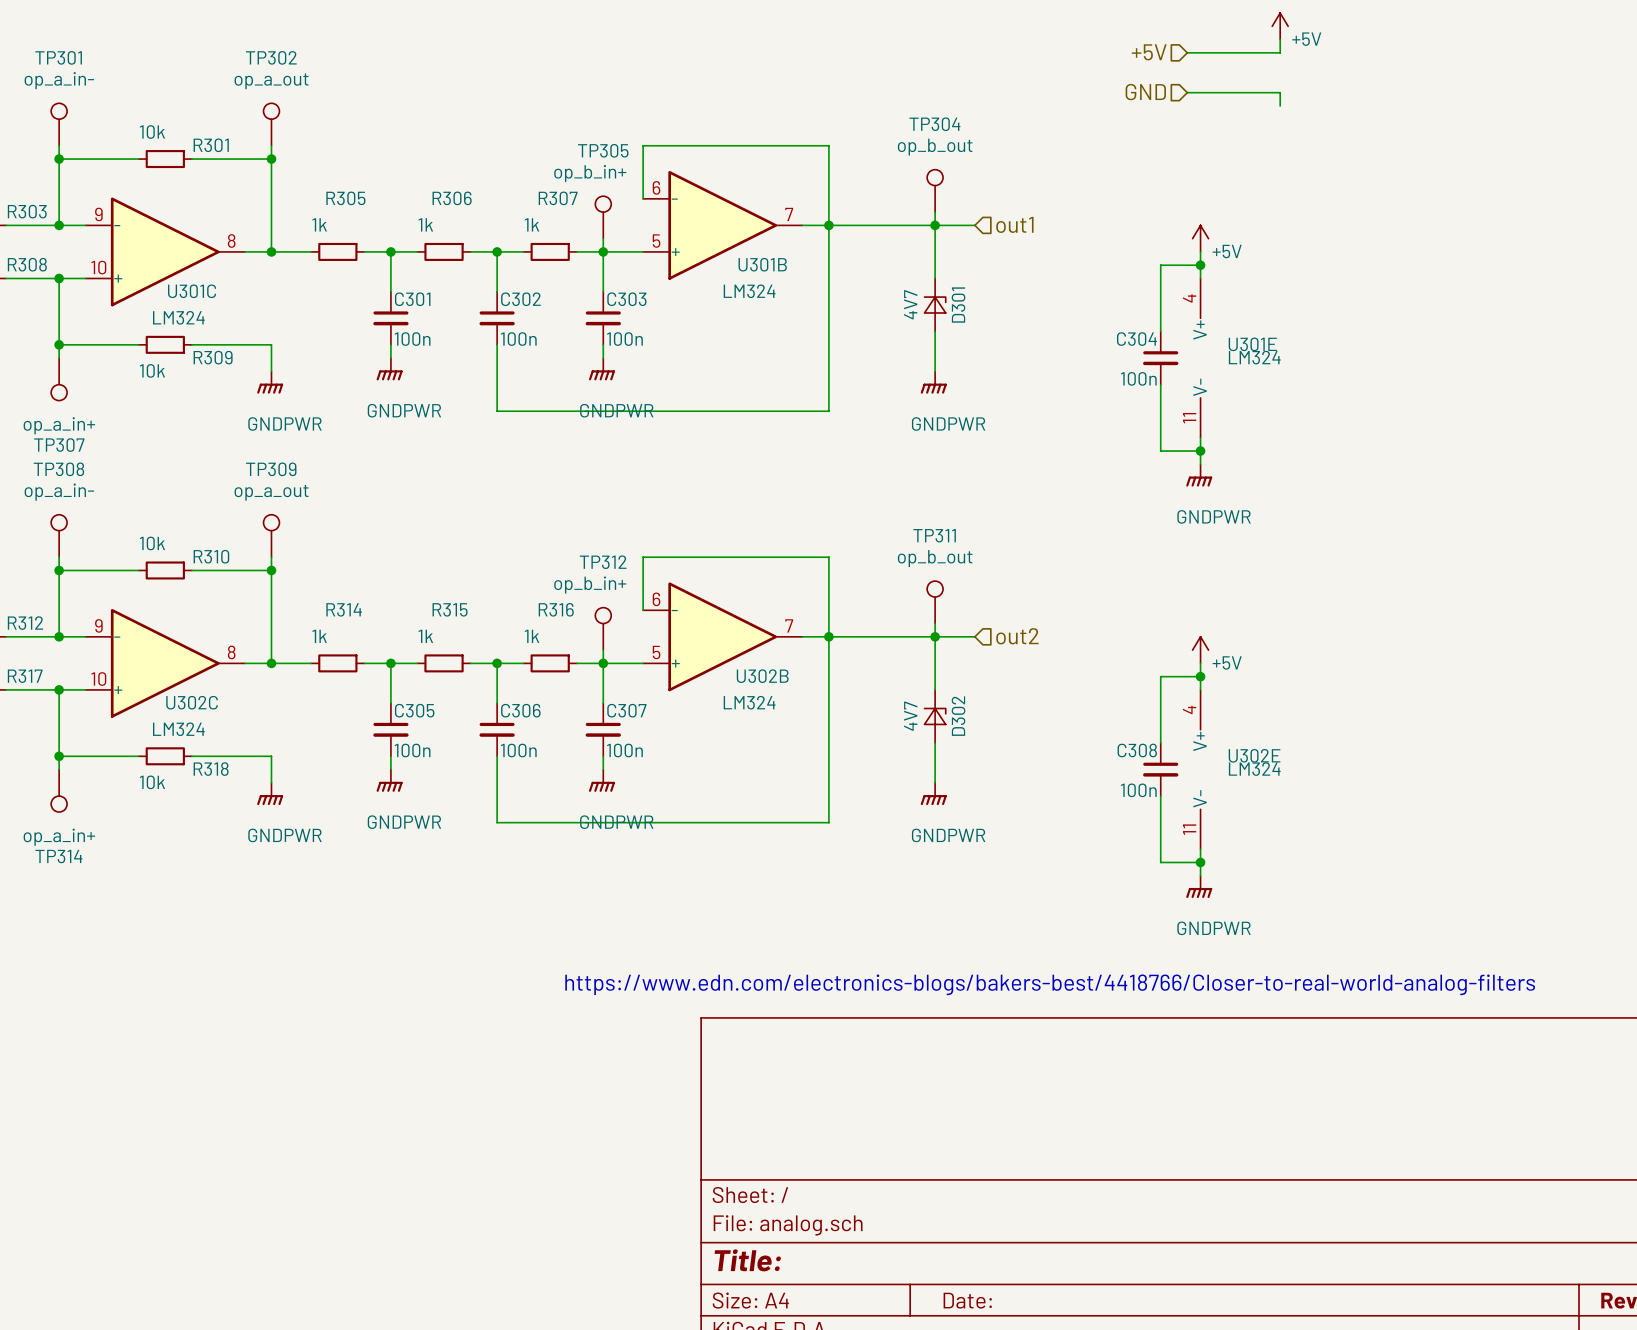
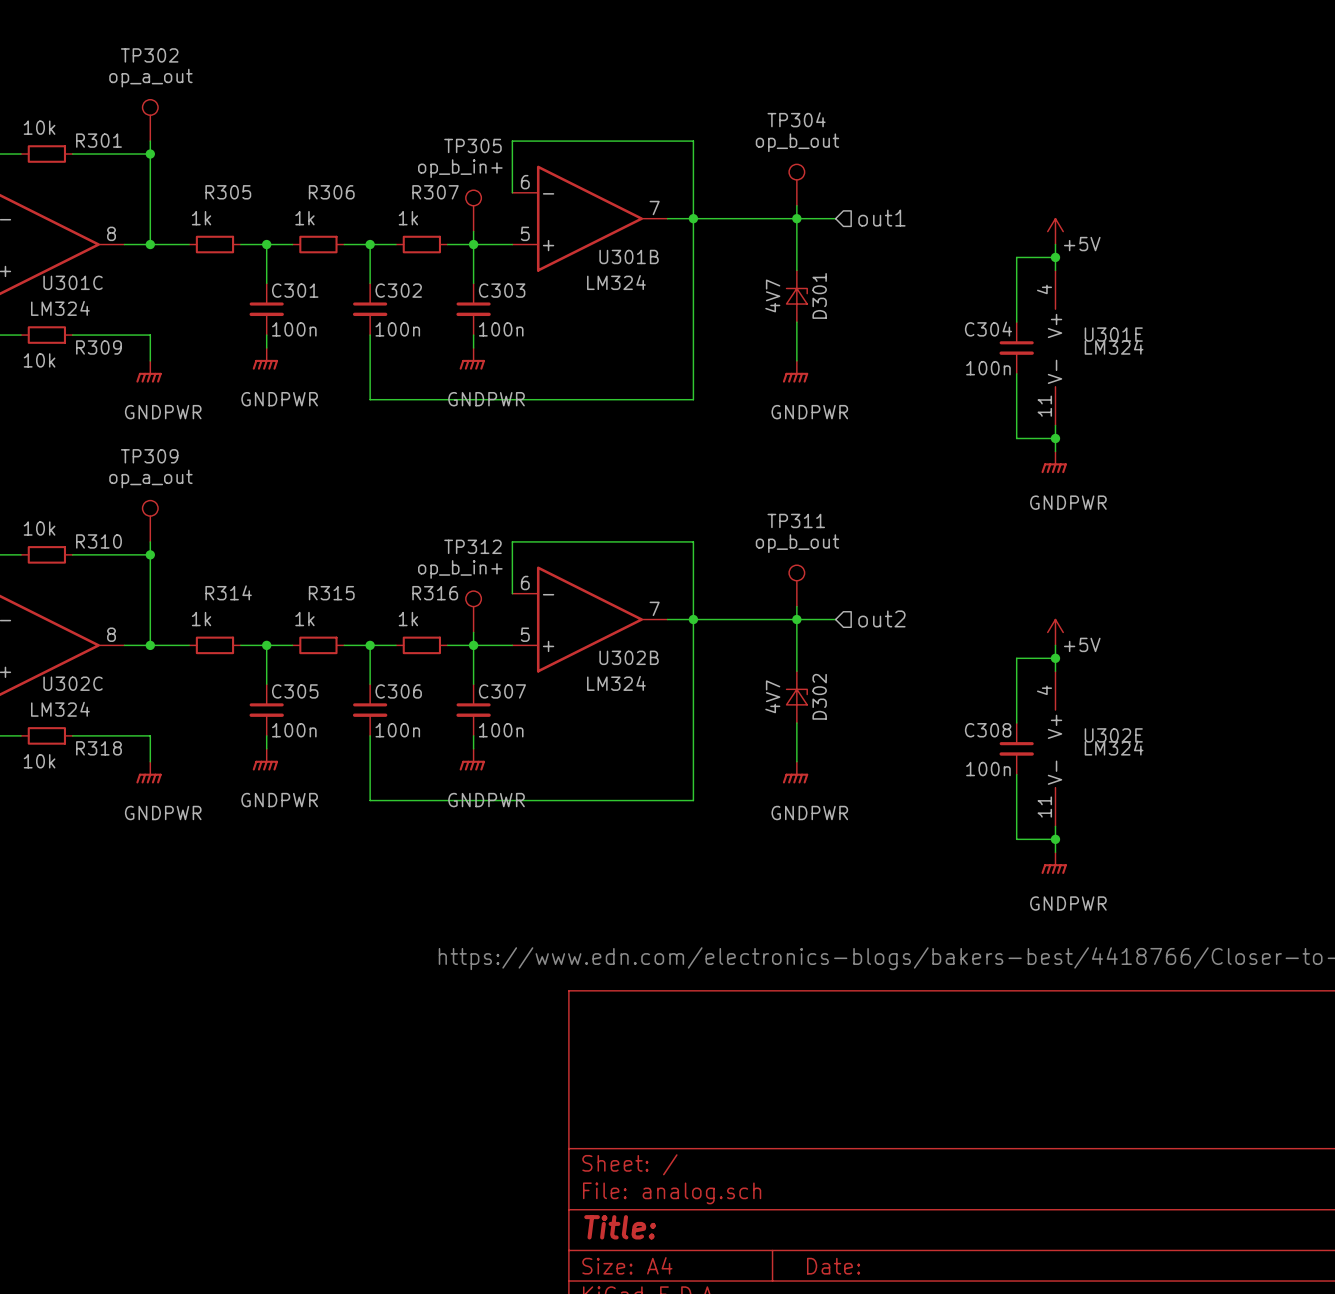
power symbol: +5V (1280, 26) -> none
wire: (1280, 39) (1280, 52) (1187, 52) -> none
hierarchical label: +5V (1149, 52) -> none
hierarchical label: GND (1145, 92) -> none
wire: (1187, 92) (1280, 92) (1280, 105) -> none

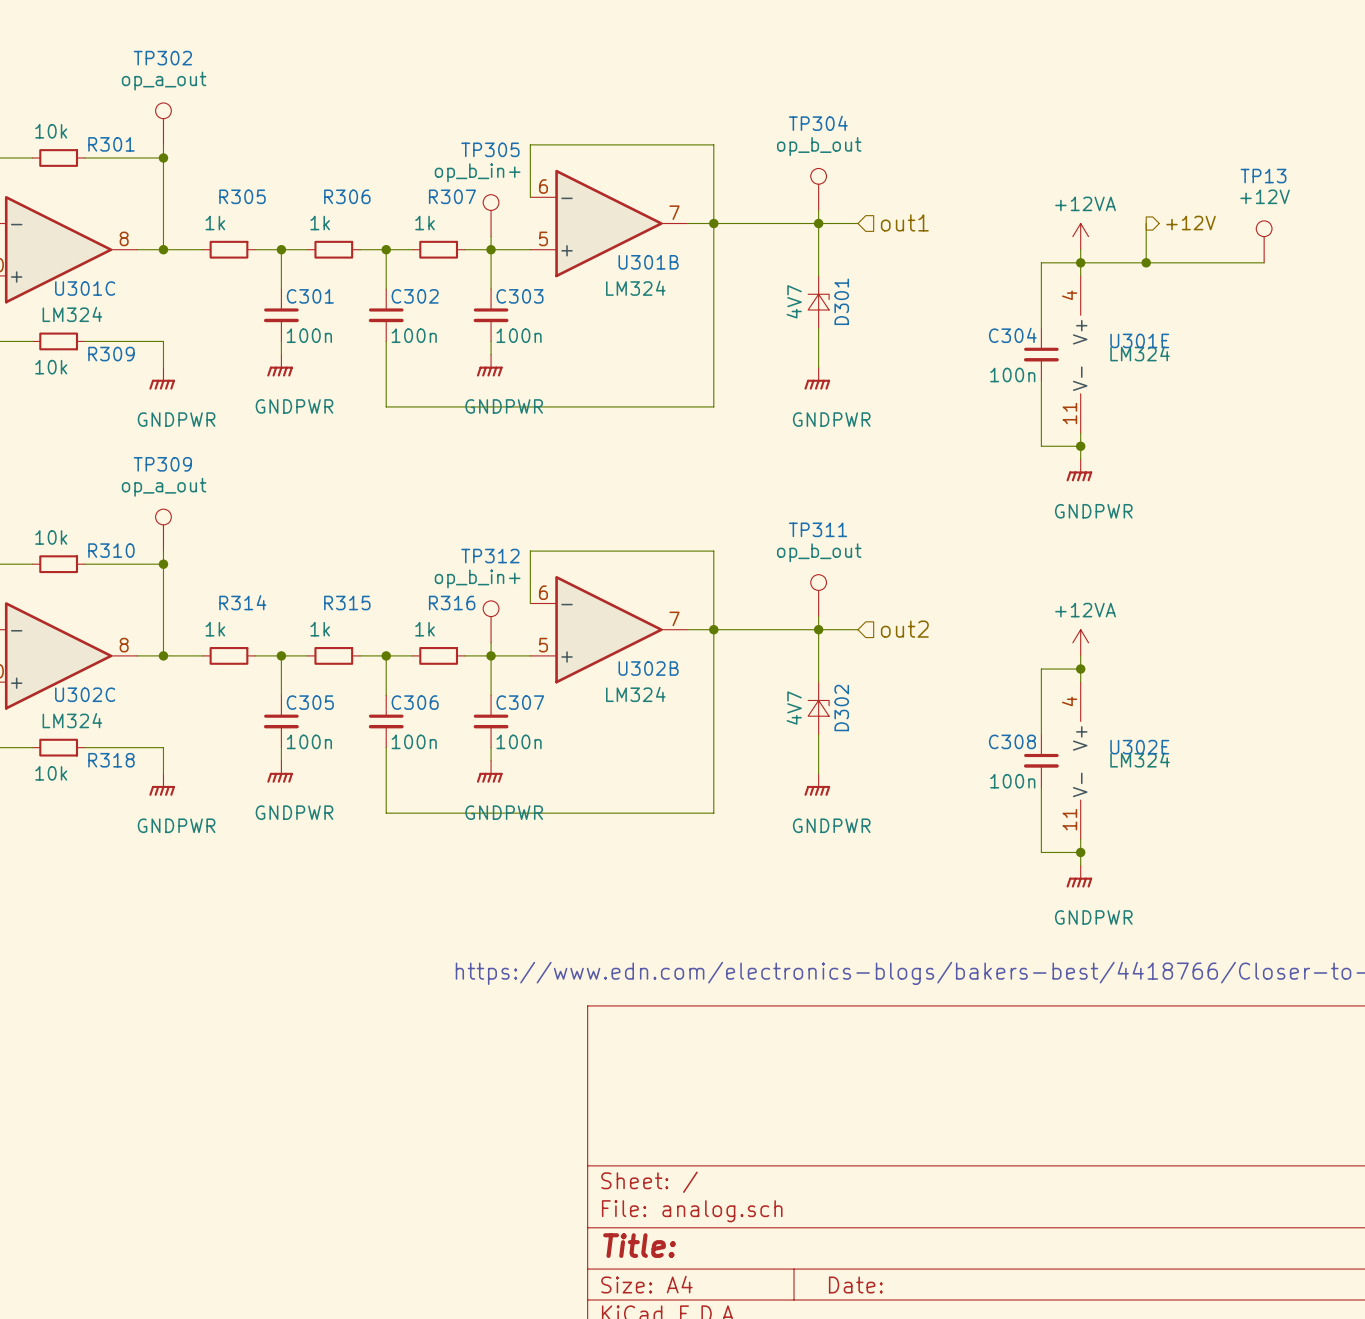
wire: none -> (1146, 223) (1146, 262)
hierarchical label: none -> +12V (1191, 223)
power symbol: +5V (1055, 231) -> +12VA (1080, 236)
TP13: none -> +12V (1264, 241)
wire: none -> (1080, 262) (1264, 262)
junction: none -> (1146, 262)
power symbol: +5V (1055, 632) -> +12VA (1080, 642)

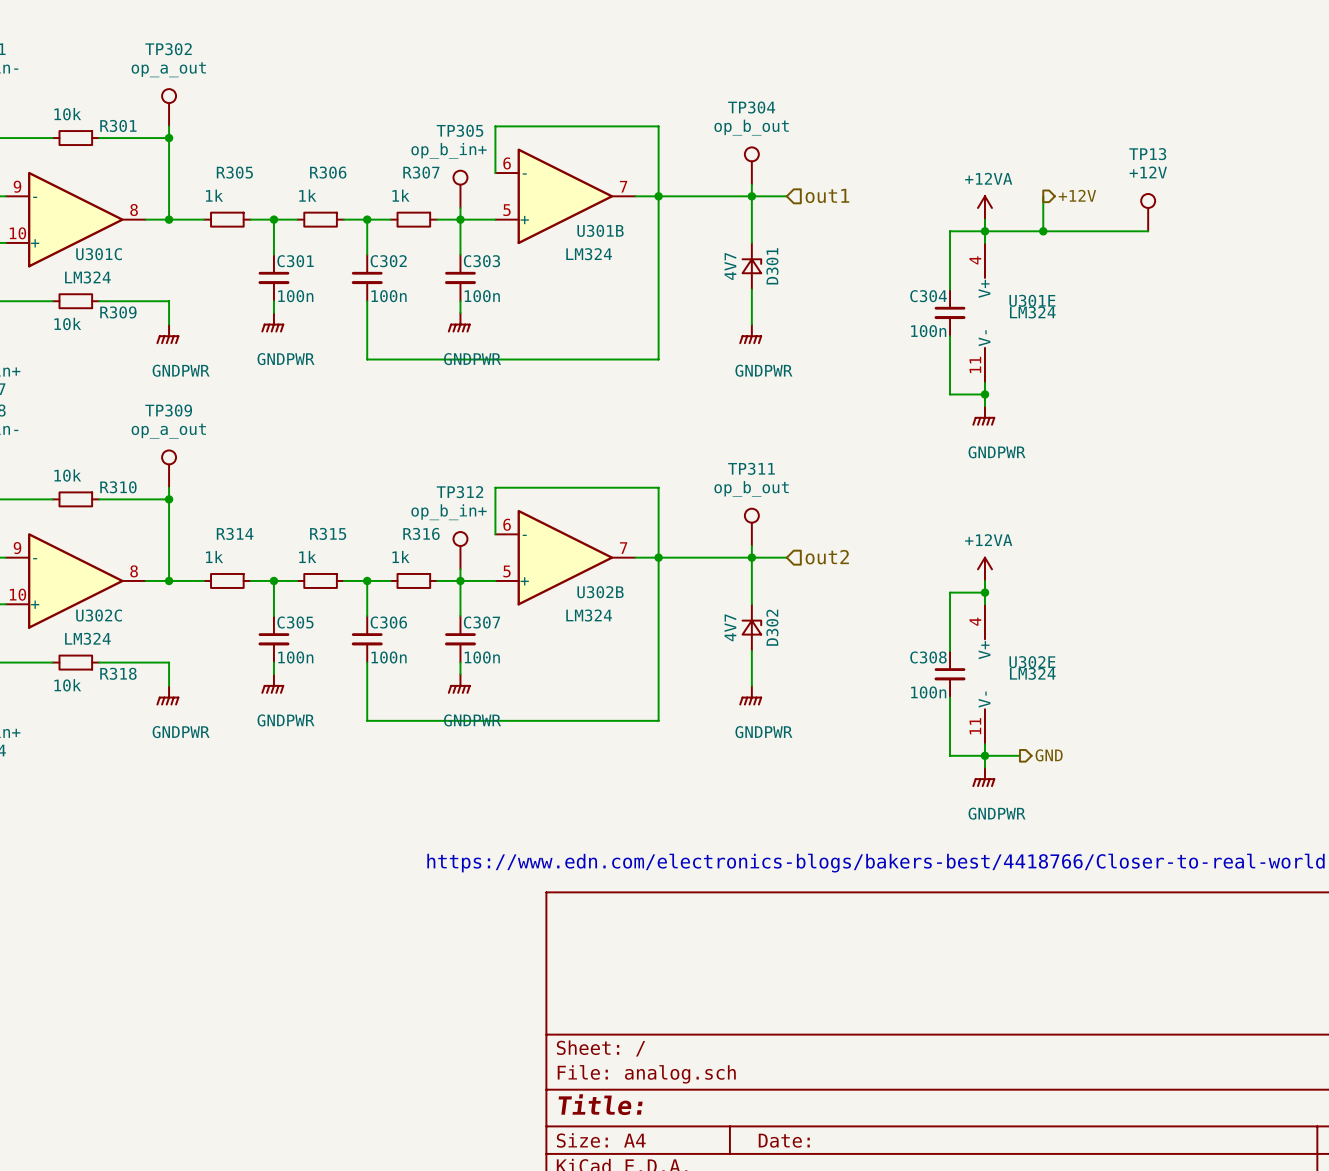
hierarchical label: none -> GND (1049, 755)
wire: none -> (984, 755) (1019, 755)

